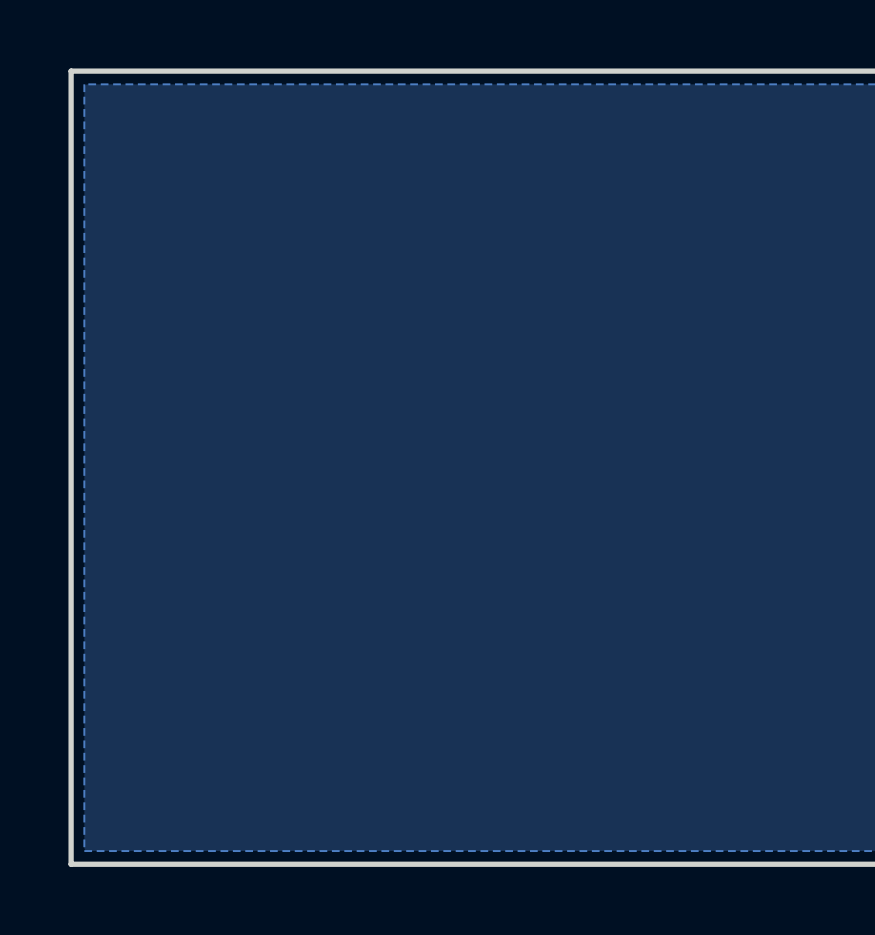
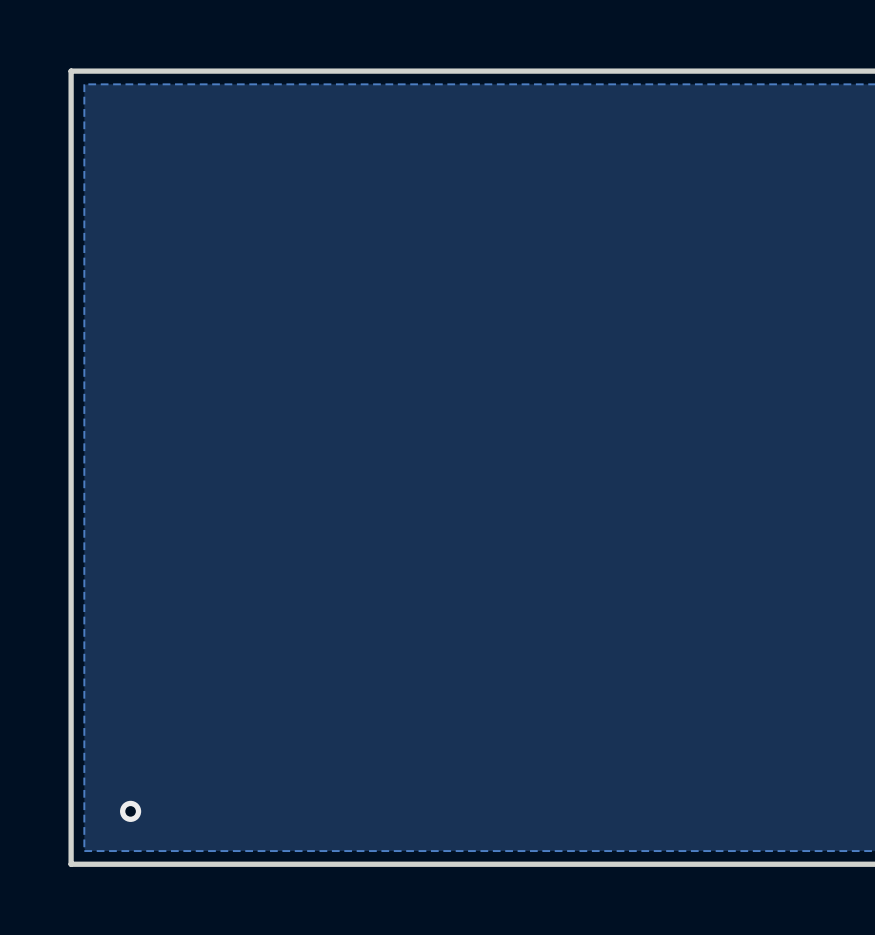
via: none -> (130, 811)

